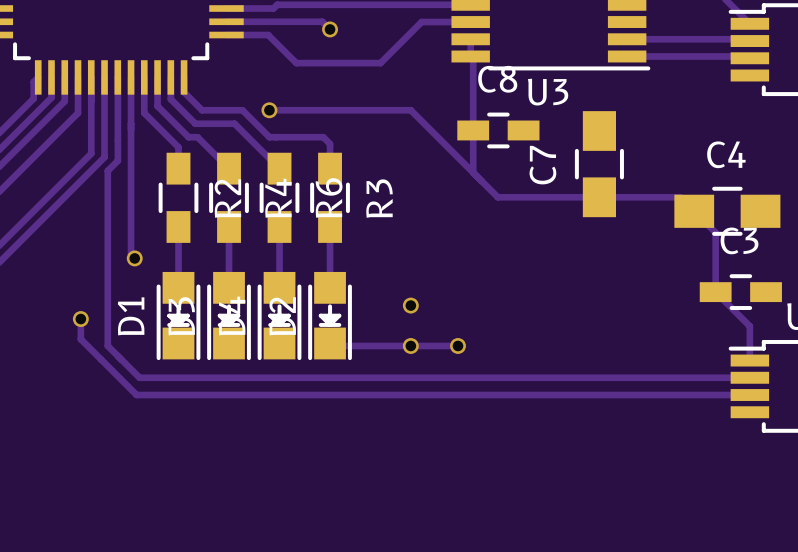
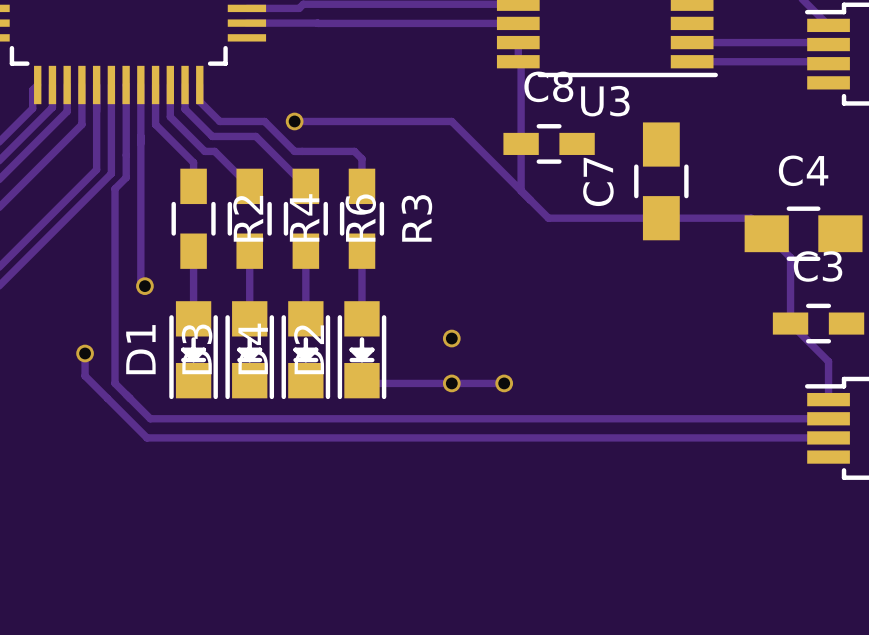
track: (290, 21) (322, 21) (330, 29) -> none
track: (421, 22) (380, 63) (296, 63) (268, 35) (226, 35) -> (463, 23) (317, 23)
via: (330, 29) -> none

